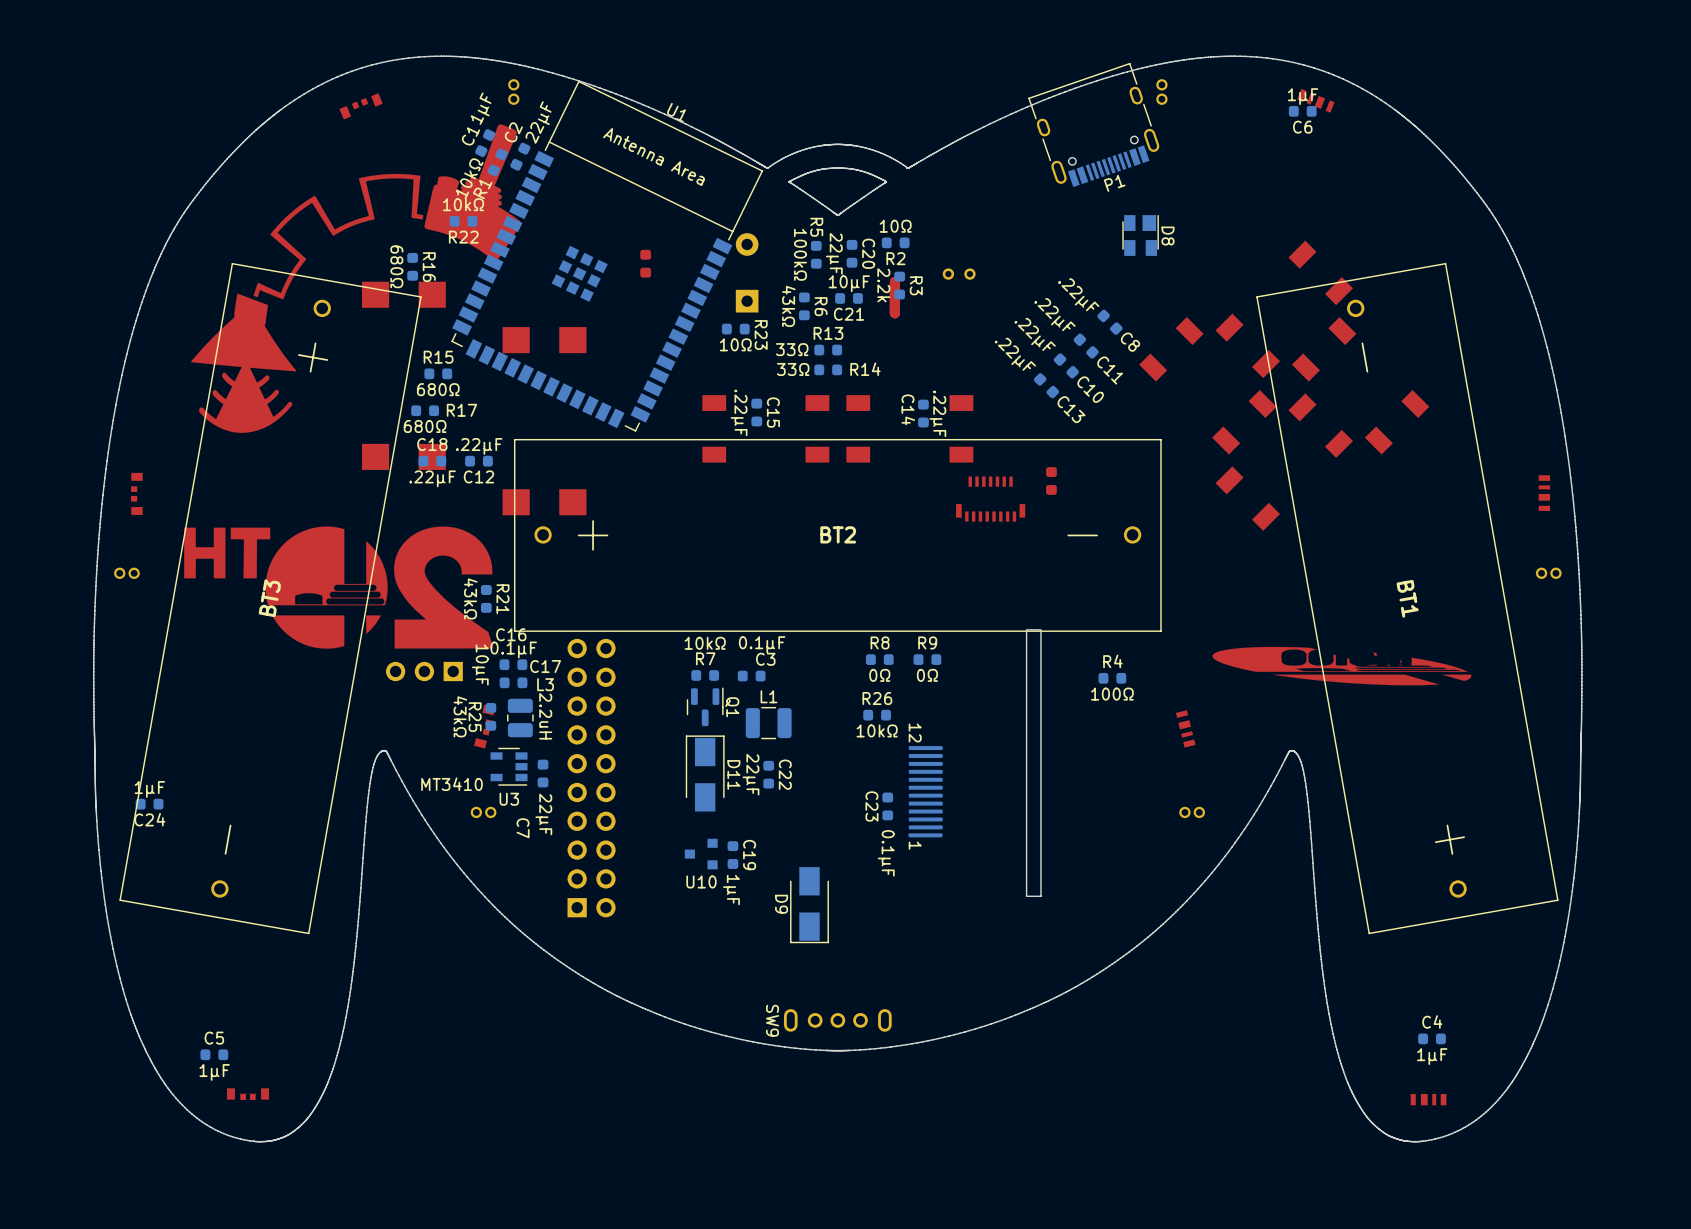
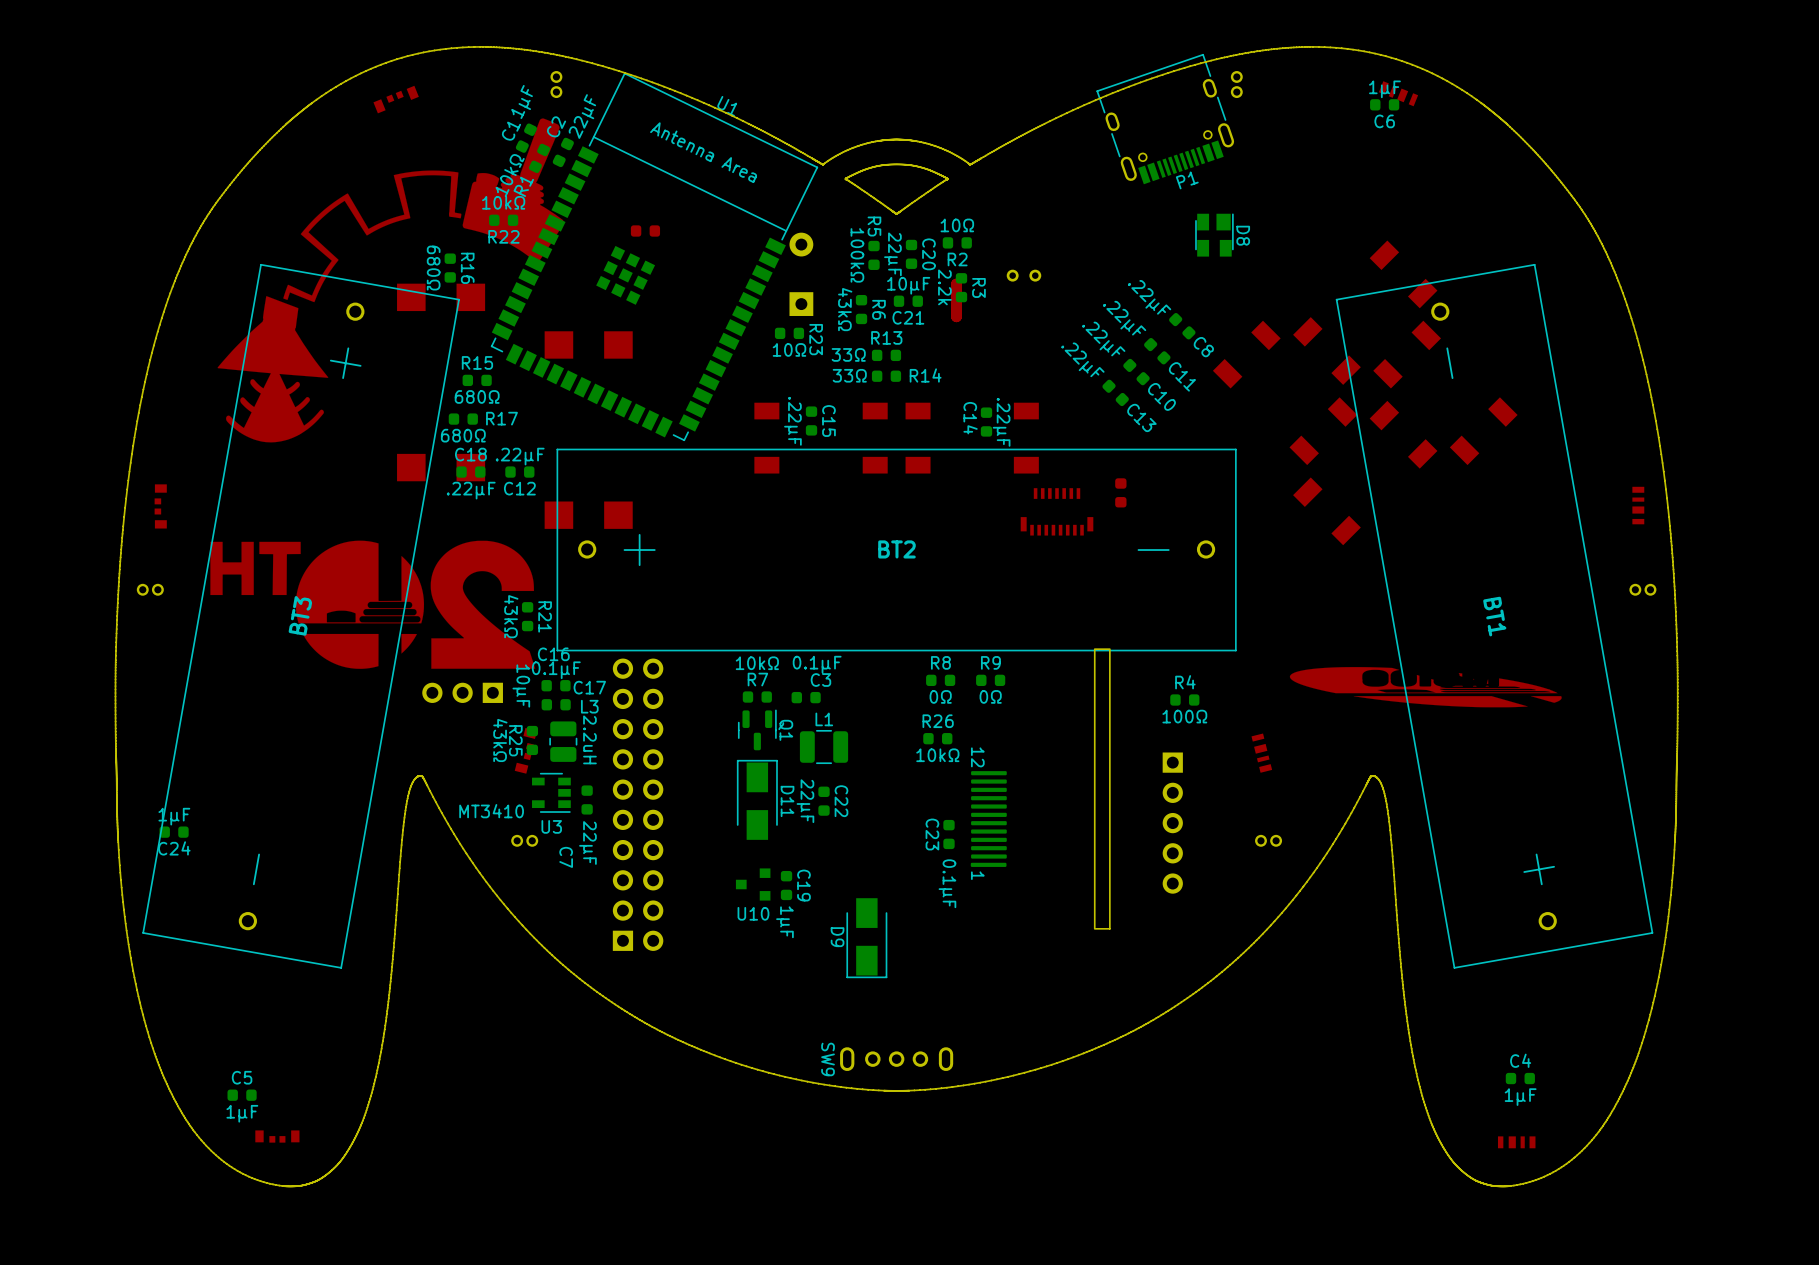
part rotation: 0° (645, 263) -> 90° clockwise (645, 231)
part position: (645, 263) -> (645, 231)
part: none -> (1172, 823)

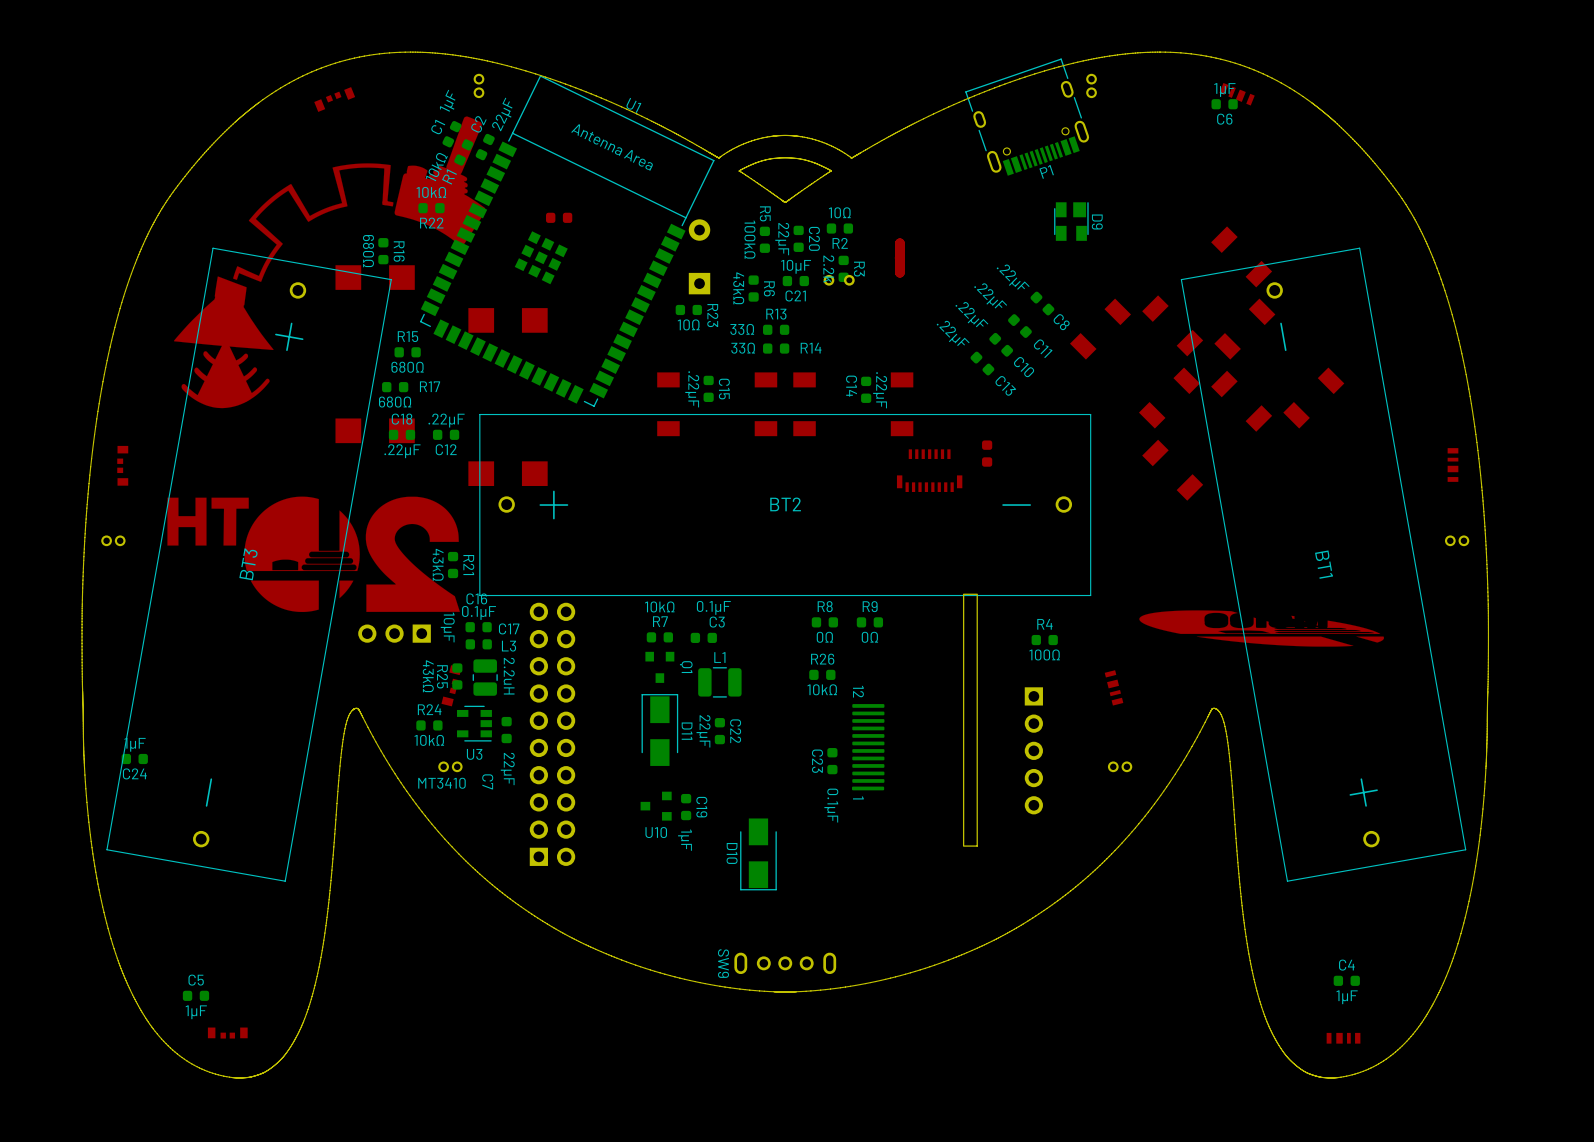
D8 name: D8 (1243, 235) -> D9 (1097, 222)
part footprint: [1006, 269, 1042, 282] -> [894, 238, 906, 278]
part footprint: [950, 278, 963, 323] -> [823, 274, 855, 286]
Q1 footprint: [738, 709, 777, 751] -> [645, 651, 675, 683]
R24: none -> 10kΩ (429, 725)
U3 value position: MT3410 (491, 811) -> MT3410 (441, 783)
D9 name: D9 (837, 937) -> D10 (732, 853)

